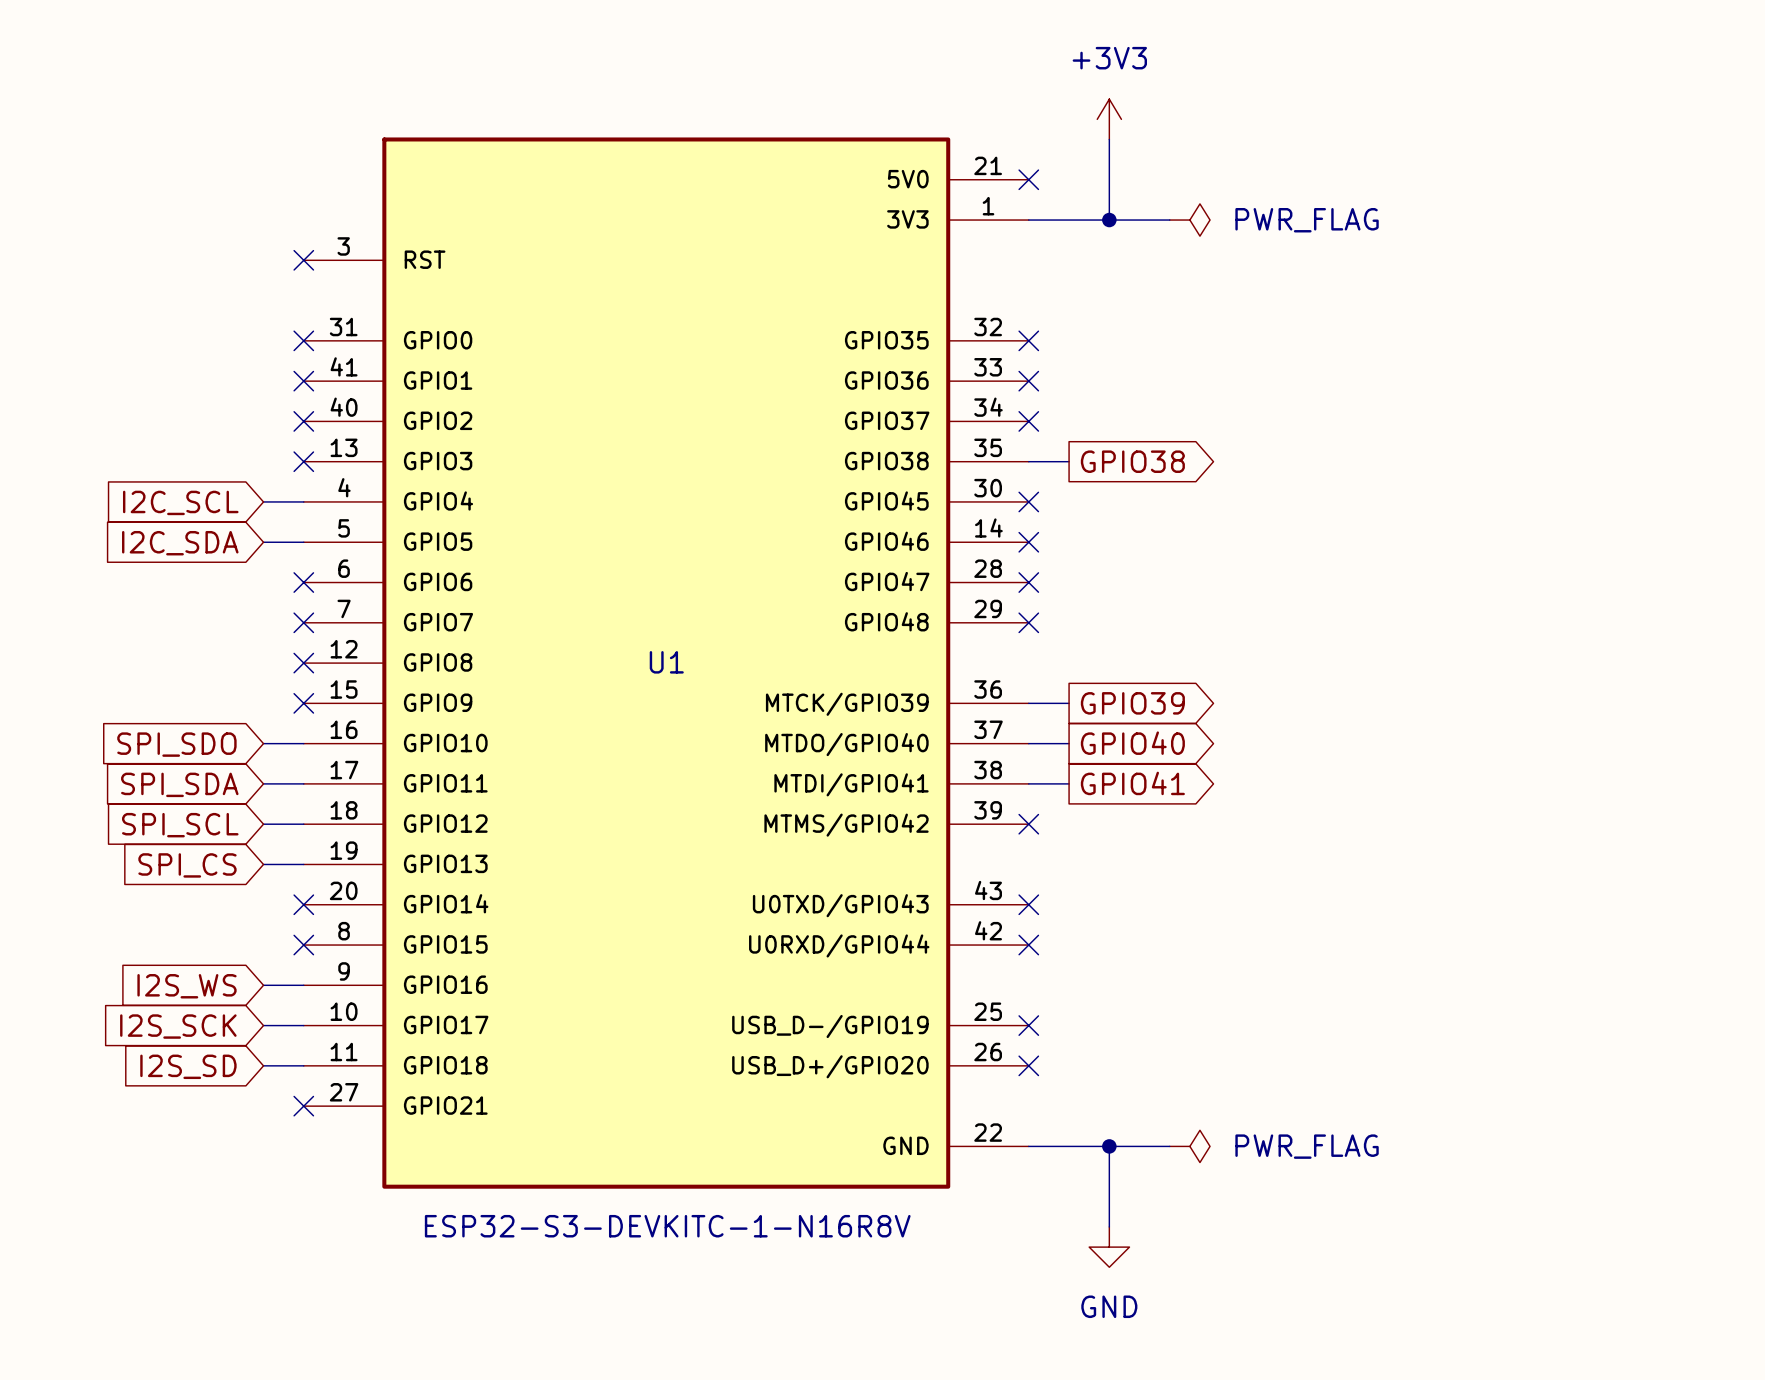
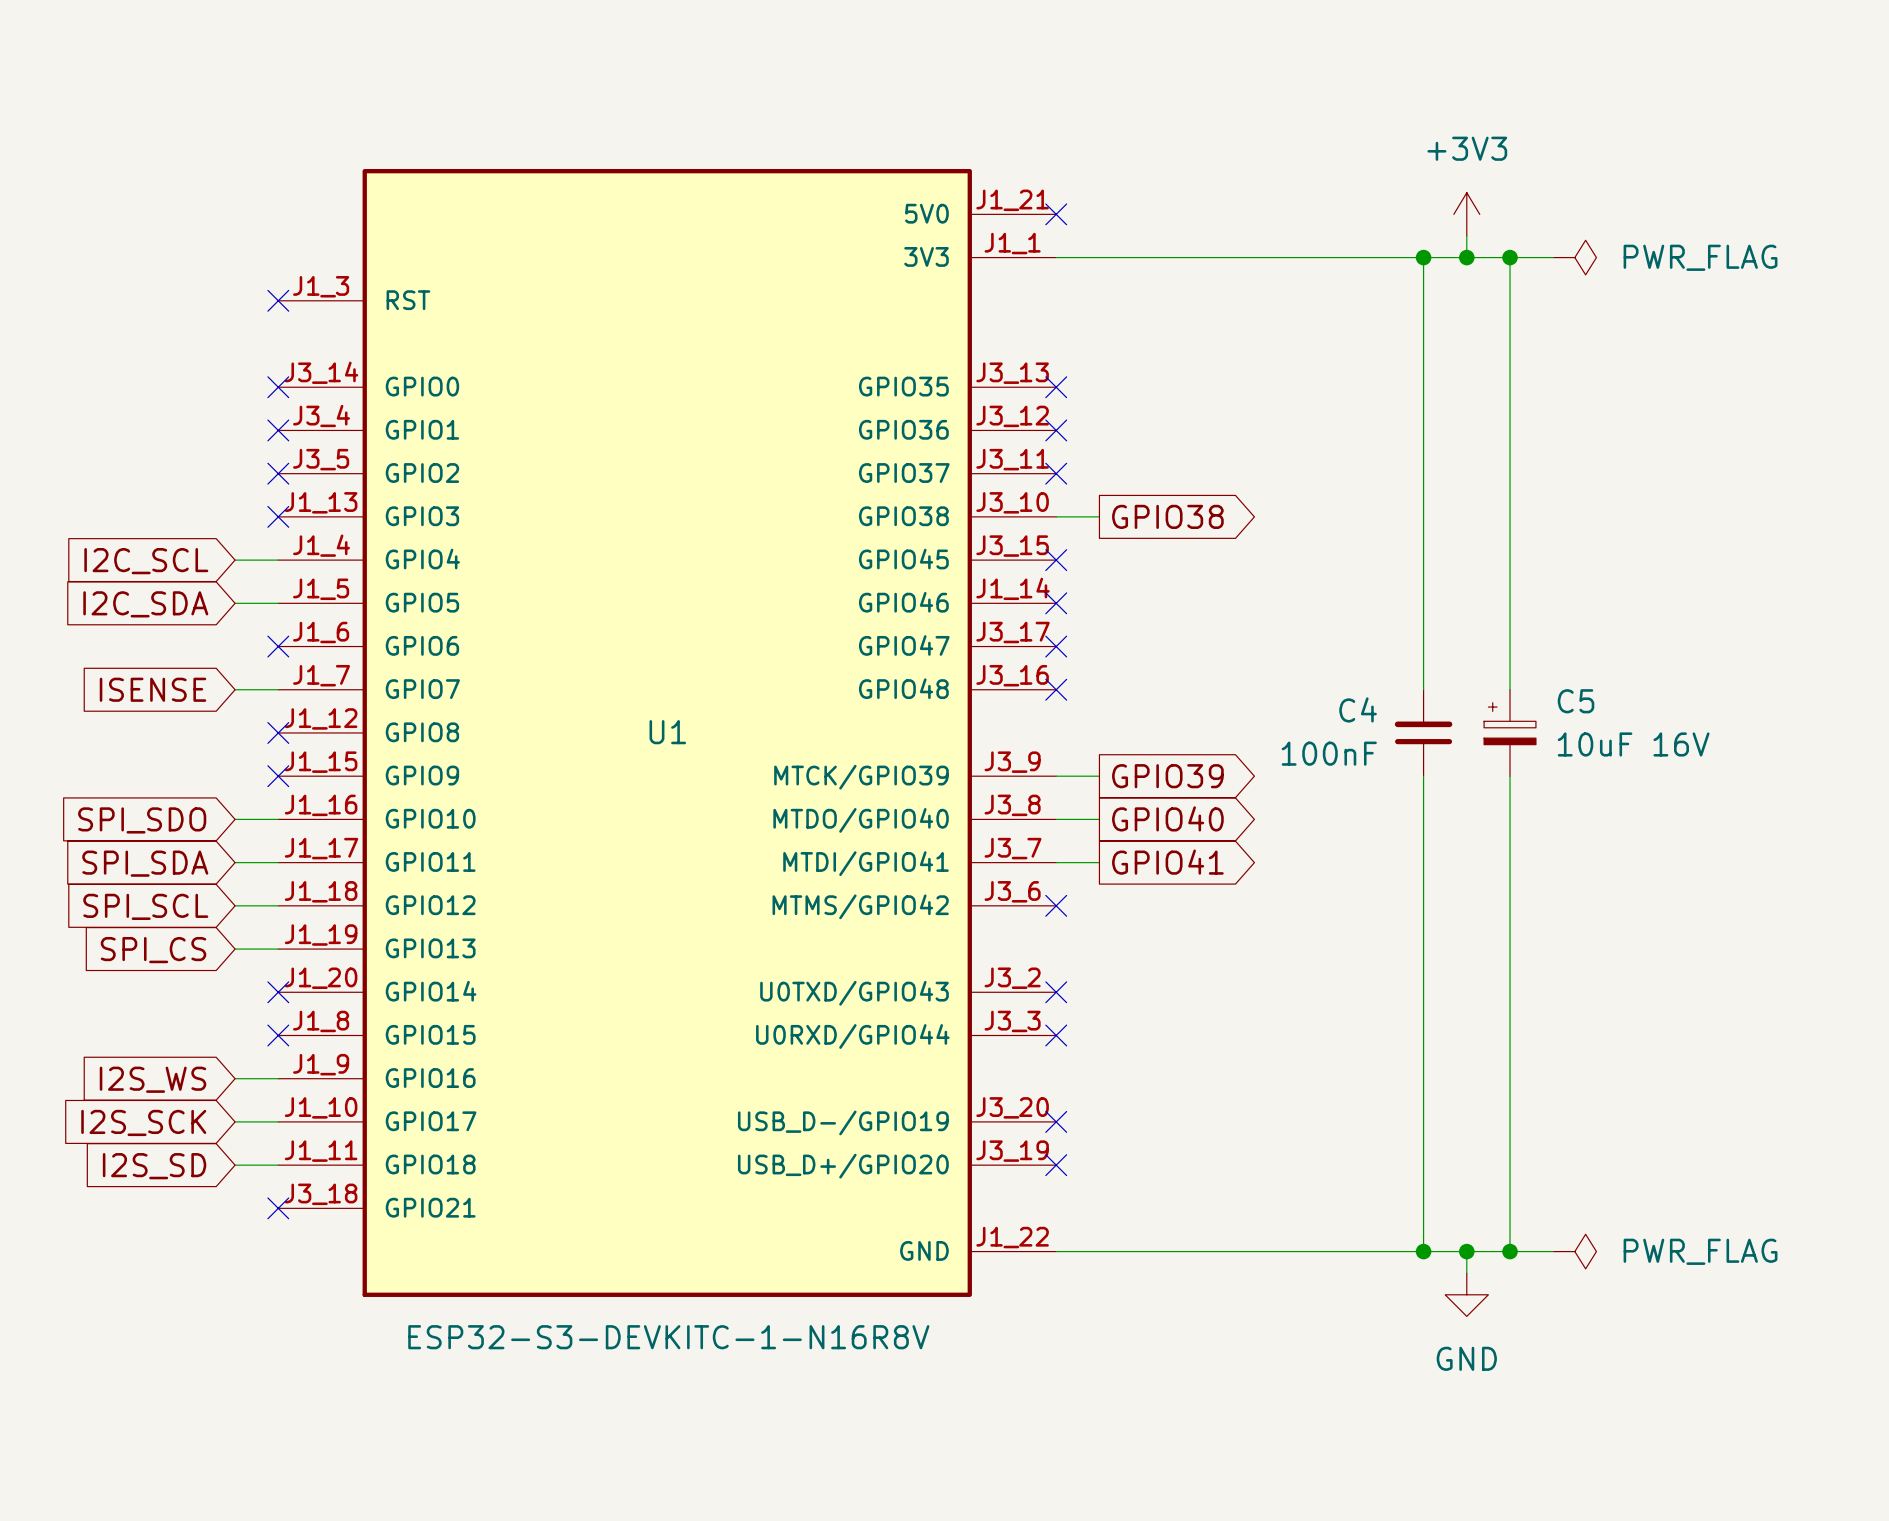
power symbol position: +3V3 (1109, 119) -> +3V3 (1466, 214)
U1 symbol: [303, 137, 1029, 1189] -> [278, 168, 1057, 1297]
wire: (1109, 139) (1109, 220) -> none
wire: none -> (1466, 235) (1466, 257)
junction: (1109, 220) -> none
wire: none -> (1207, 257) (1553, 257)
power symbol position: PWR_FLAG (1189, 220) -> PWR_FLAG (1574, 257)
wire: none -> (1423, 257) (1423, 689)
junction: none -> (1423, 257)
junction: none -> (1466, 257)
wire: none -> (1510, 257) (1510, 689)
junction: none -> (1510, 257)
global label: none -> ISENSE (153, 689)
wire: none -> (235, 689) (278, 689)
no-connect mark: (303, 622) -> none
C4: none -> 100nF (1423, 732)
C5: none -> 10uF 16V (1510, 732)
wire: none -> (1423, 776) (1423, 1251)
wire: none -> (1510, 776) (1510, 1251)
wire: (1109, 1146) (1109, 1226) -> none
junction: (1109, 1146) -> none
wire: none -> (1207, 1251) (1553, 1251)
power symbol position: PWR_FLAG (1189, 1146) -> PWR_FLAG (1574, 1251)
junction: none -> (1423, 1251)
wire: none -> (1466, 1251) (1466, 1273)
junction: none -> (1466, 1251)
junction: none -> (1510, 1251)
power symbol position: GND (1109, 1247) -> GND (1466, 1294)

